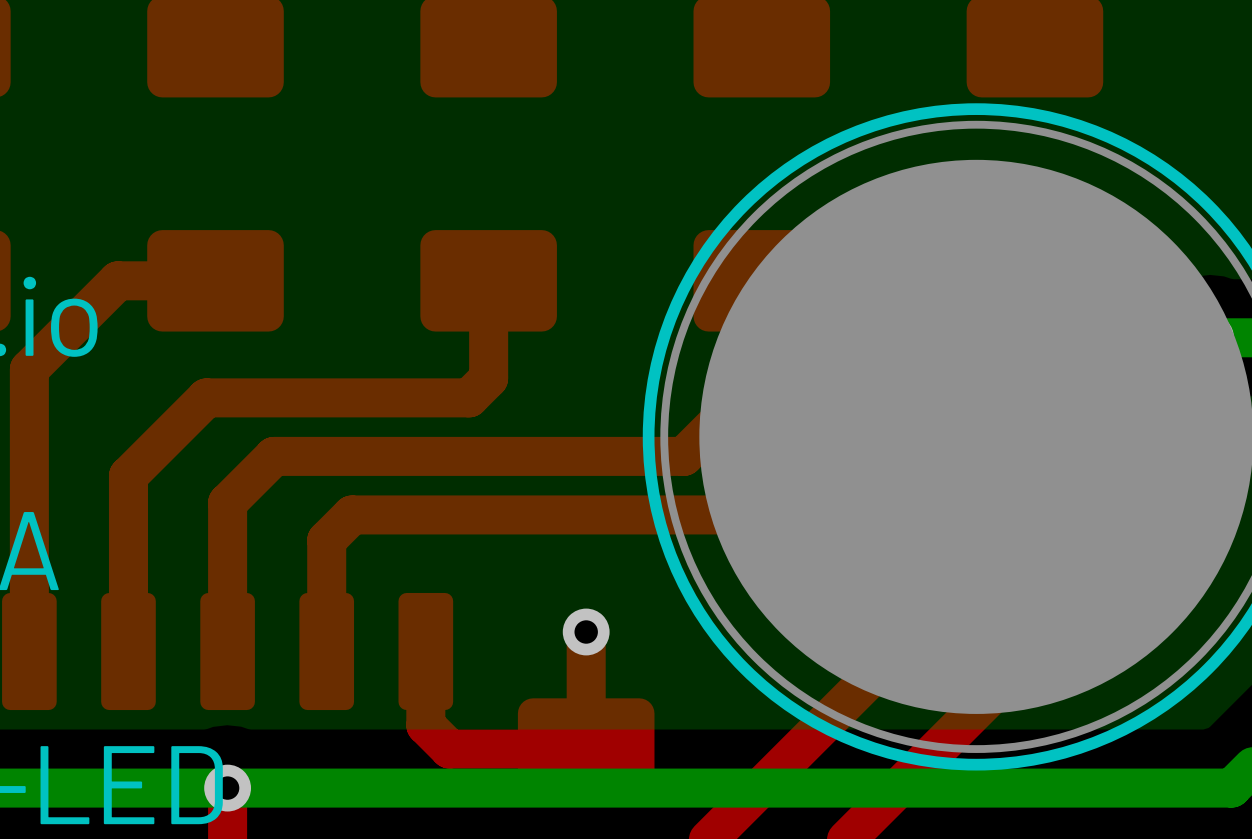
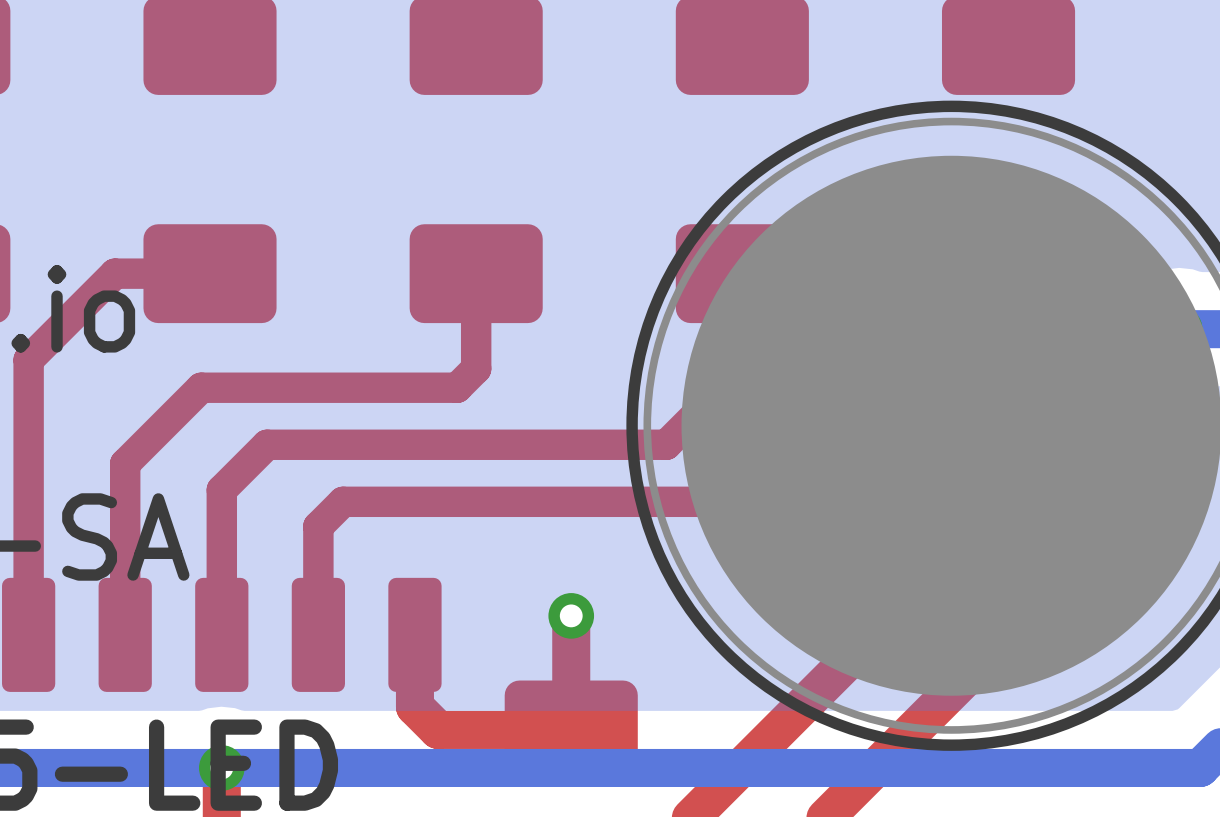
top track width: thick (215, 280) (117, 280) (29, 369) (29, 651) -> thin (210, 273) (114, 273) (28, 359) (28, 634)
top track width: thick (488, 280) (488, 378) (469, 397) (206, 397) (128, 475) (128, 651) -> thin (476, 273) (476, 368) (457, 387) (201, 387) (125, 463) (125, 634)
top track width: thick (761, 280) (761, 378) (683, 456) (274, 456) (227, 502) (227, 651) -> thin (742, 273) (742, 368) (666, 444) (267, 444) (221, 490) (221, 634)
top track width: thick (1034, 280) (1034, 378) (898, 514) (352, 514) (326, 540) (326, 651) -> thin (1008, 273) (1008, 368) (875, 501) (343, 501) (318, 526) (318, 634)

